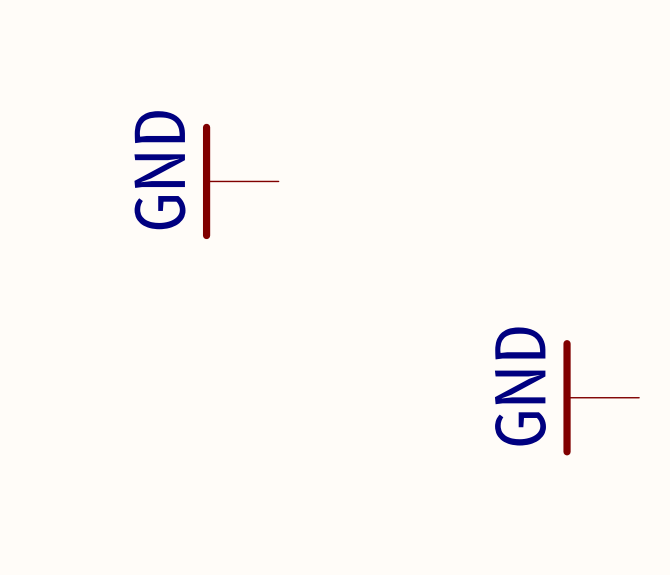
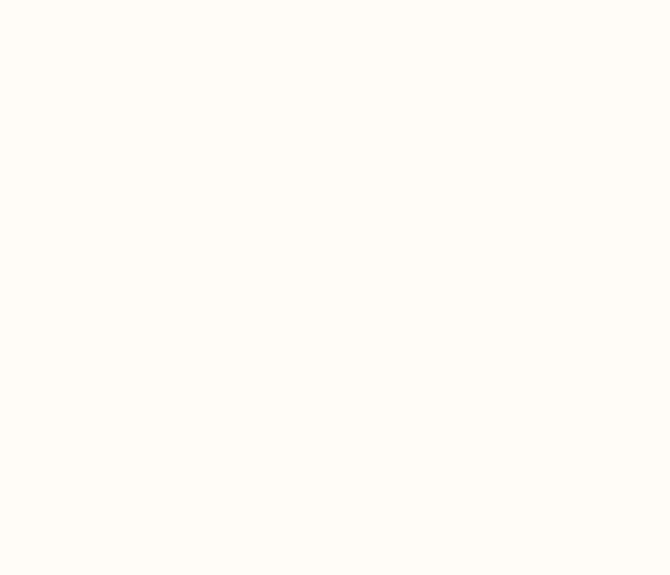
power symbol: GND (240, 181) -> none
power symbol: GND (601, 397) -> none

